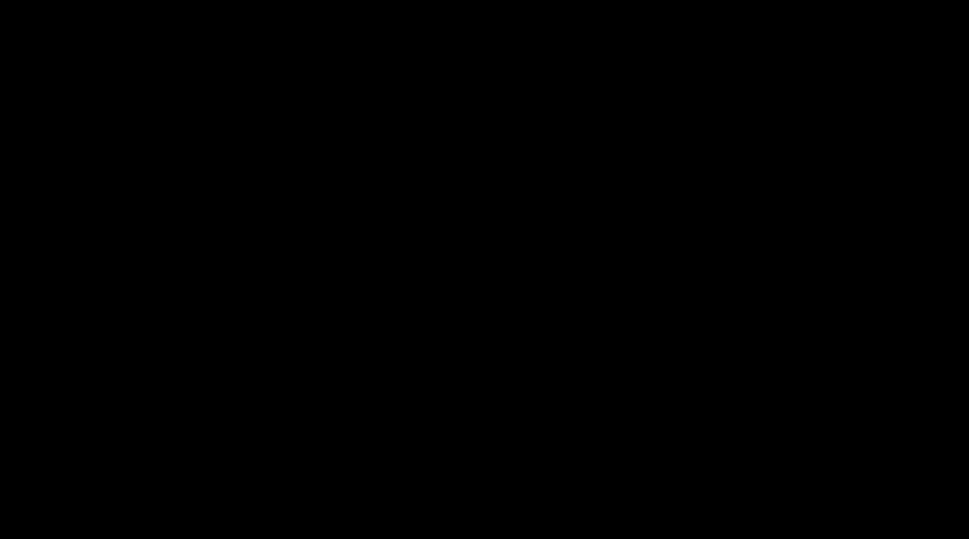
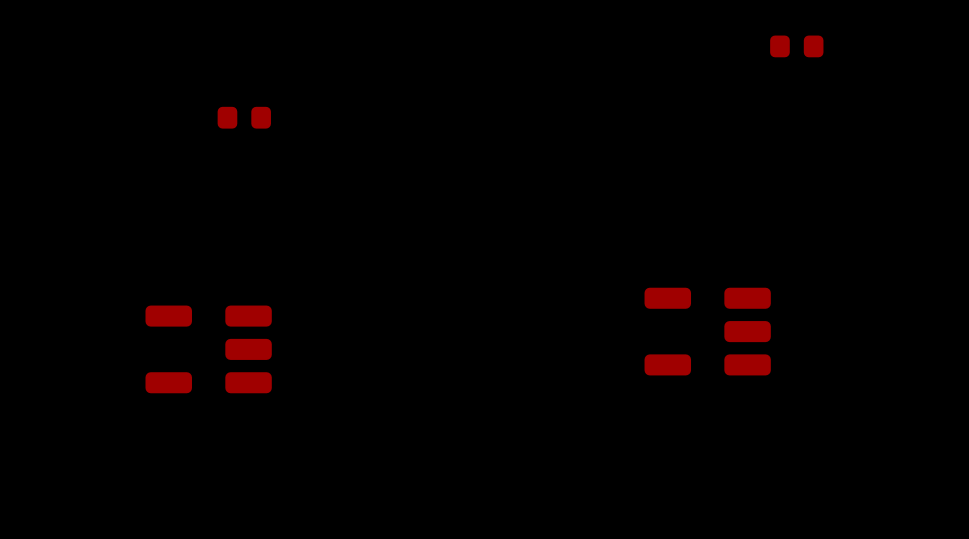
part: none -> (796, 46)
part: none -> (244, 117)
part: none -> (707, 331)
part: none -> (208, 349)

